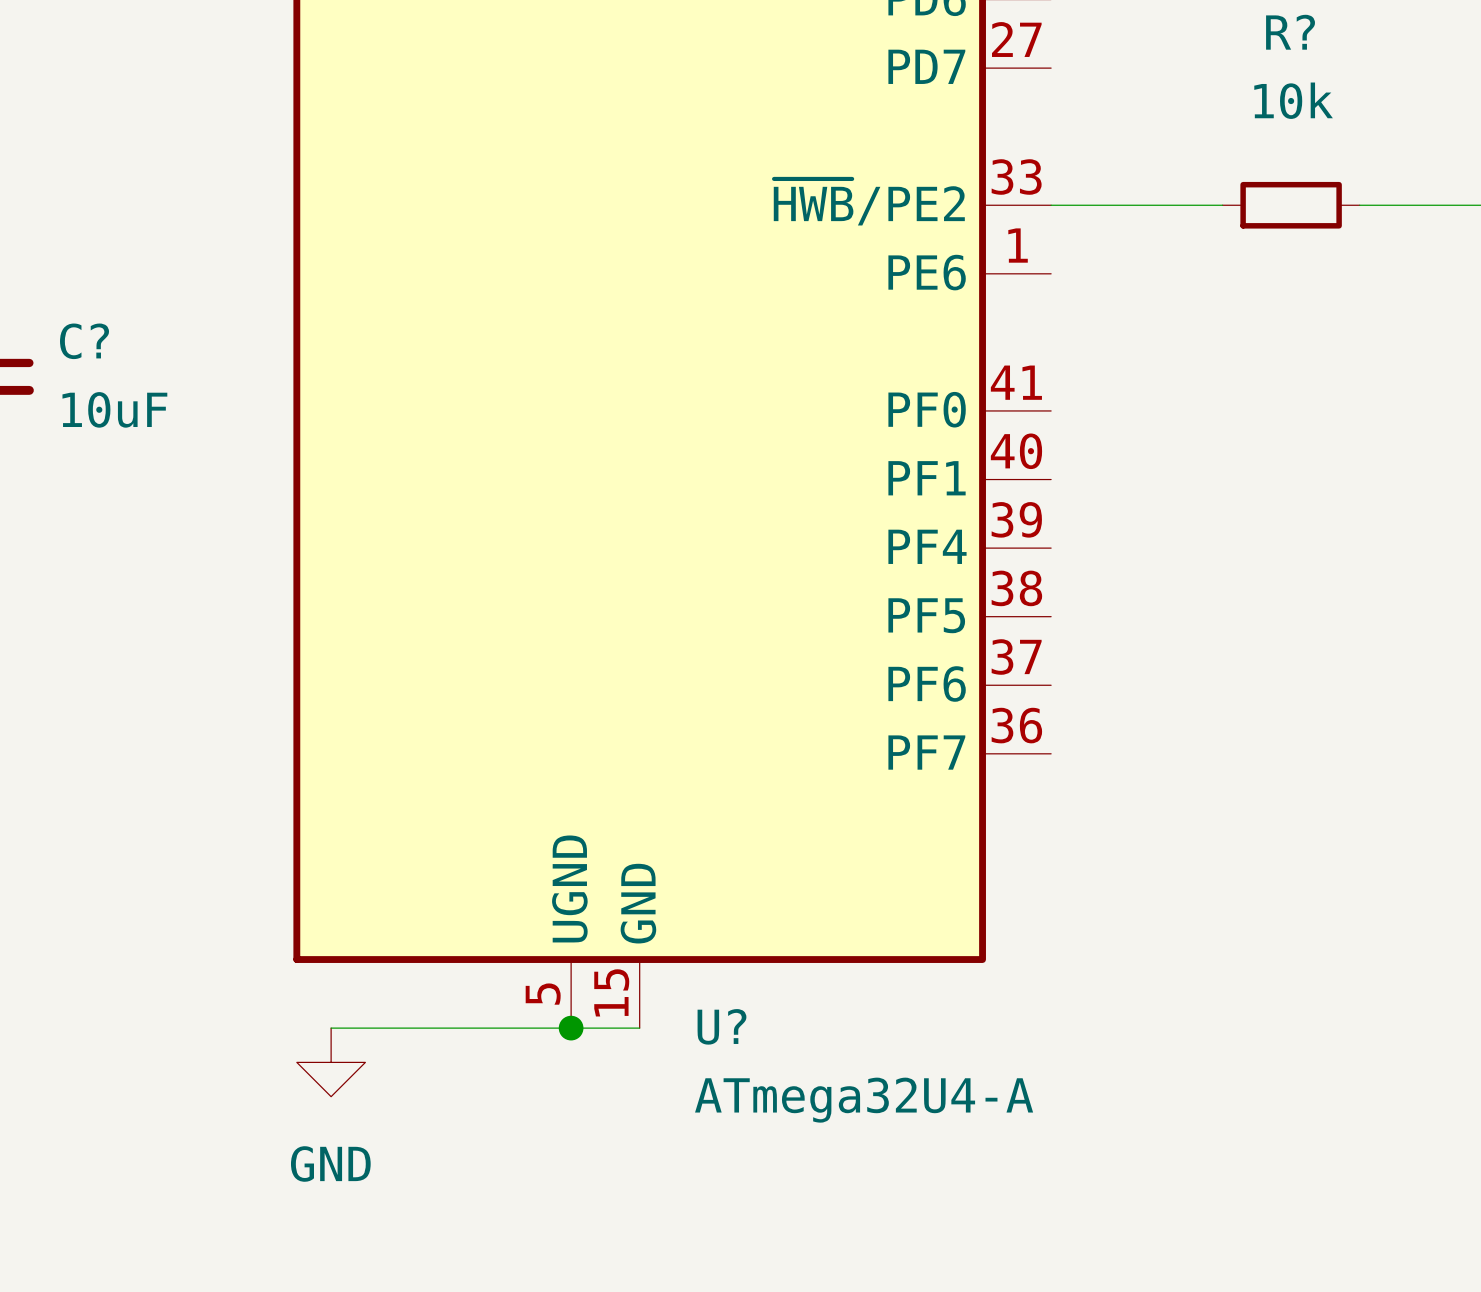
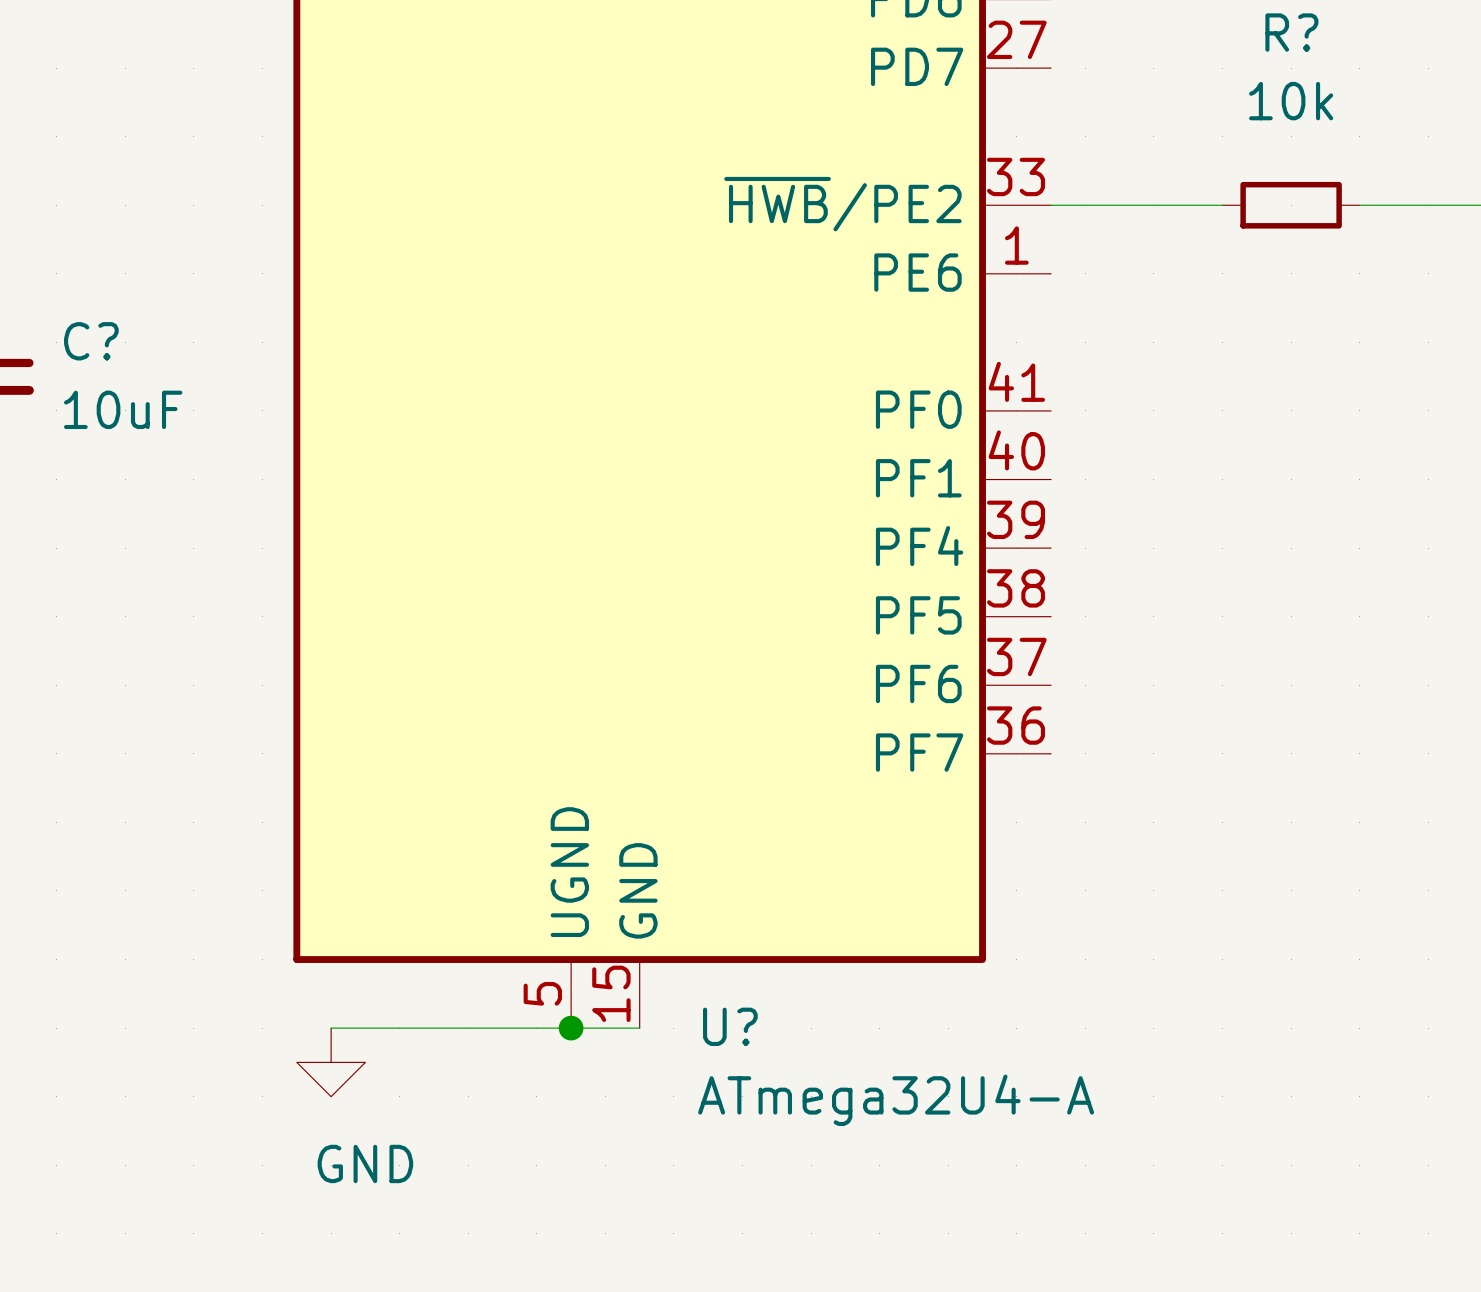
power symbol text position: GND (330, 1163) -> GND (365, 1163)

